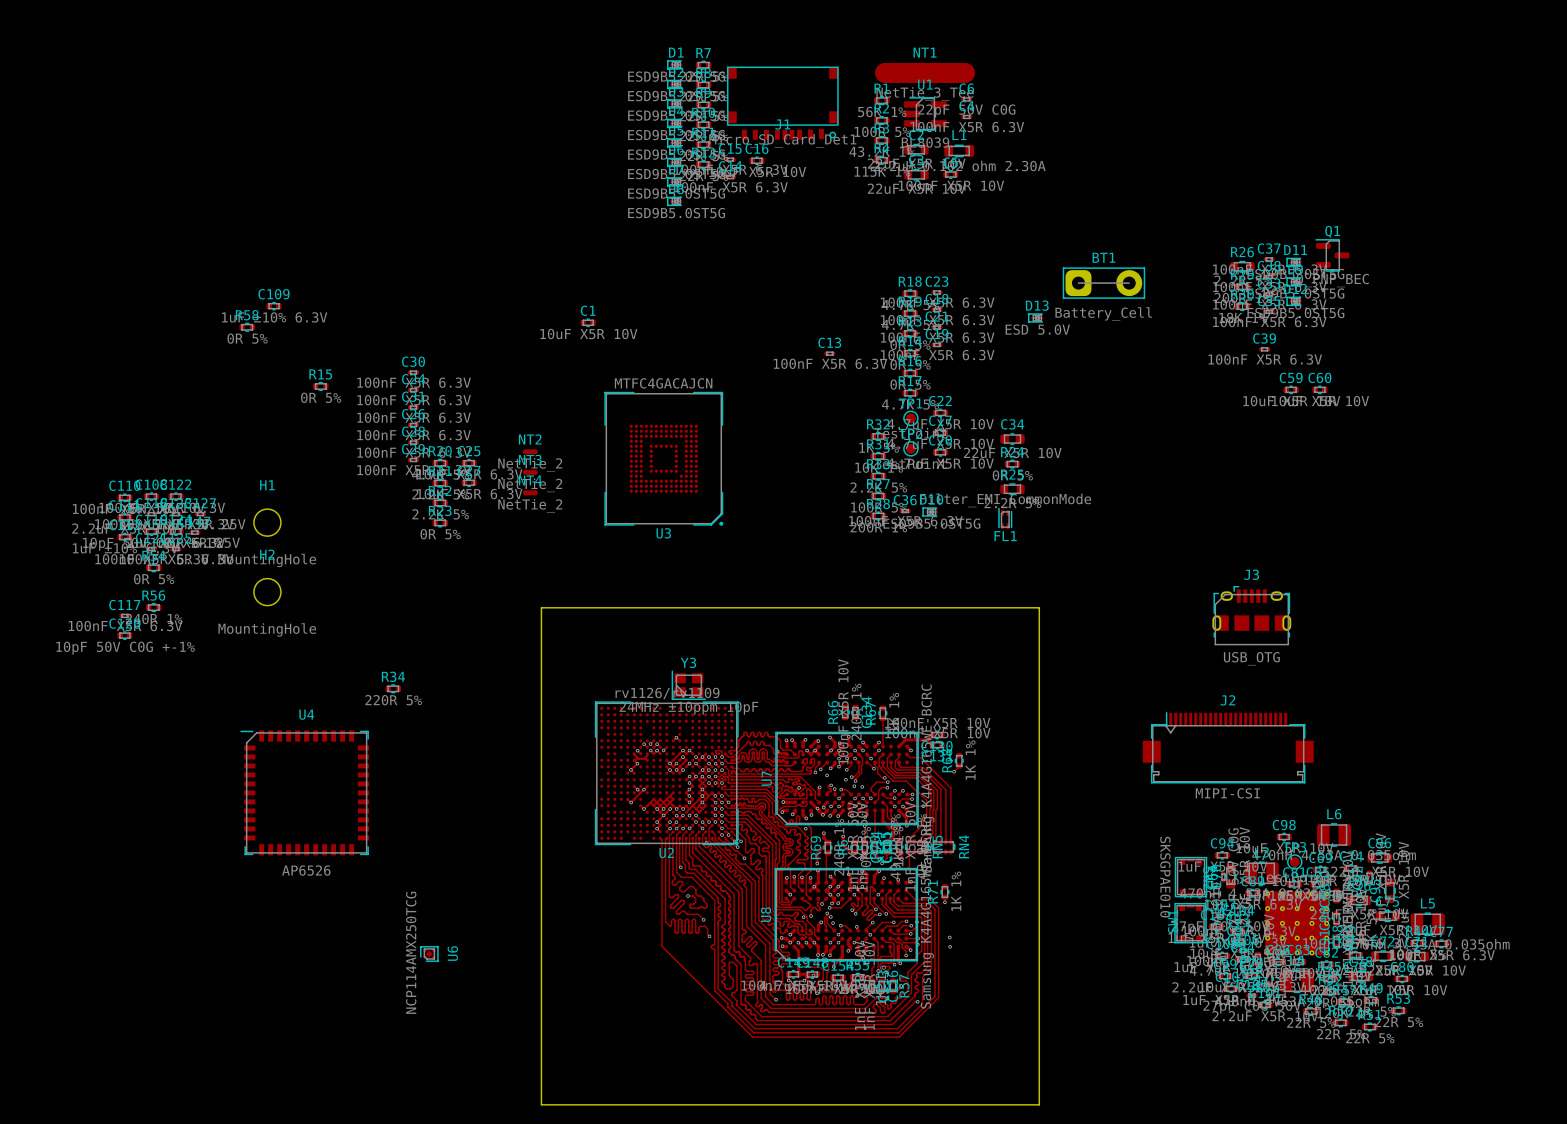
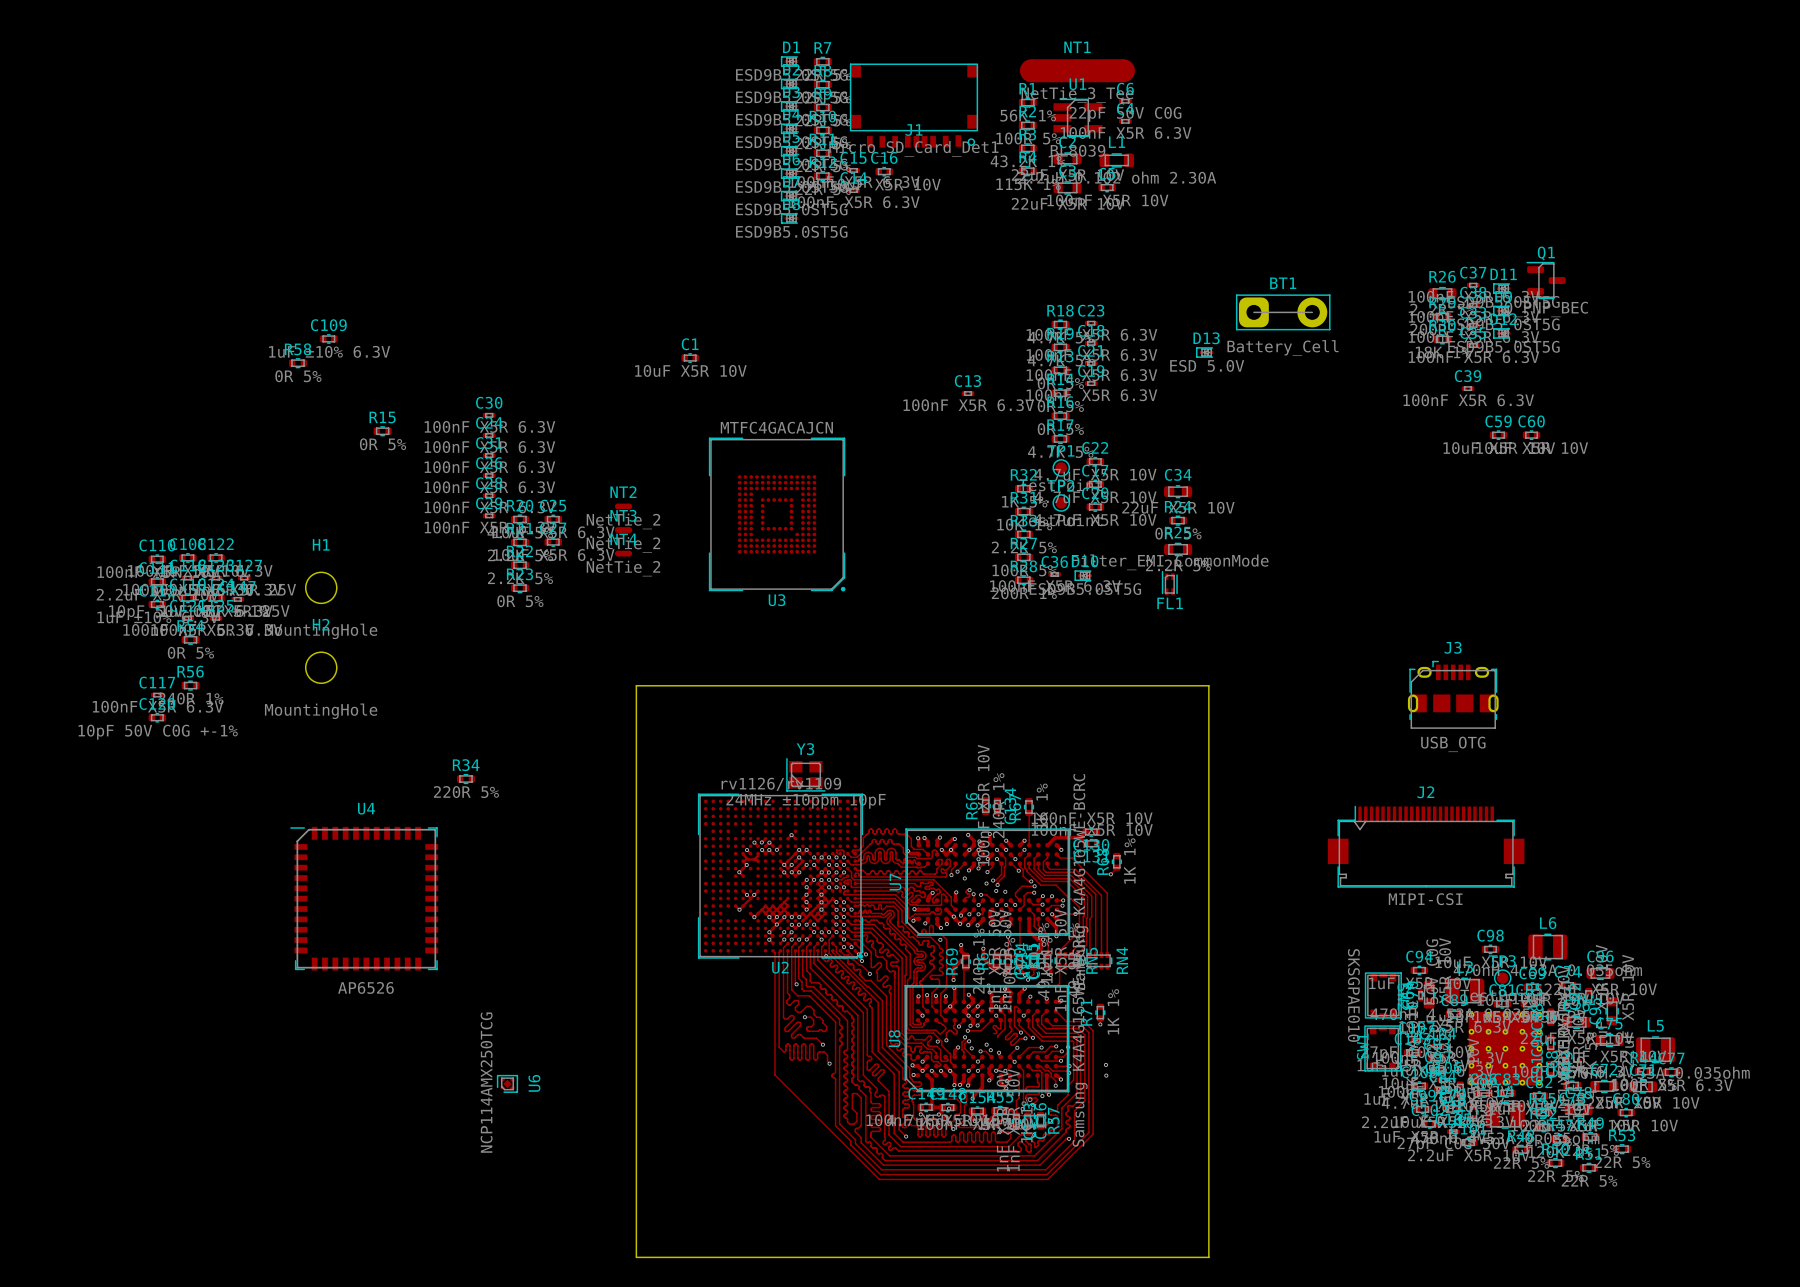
via: (852, 910) -> none
via: (855, 913) -> none
via: none -> (986, 1044)
via: none -> (990, 1050)

